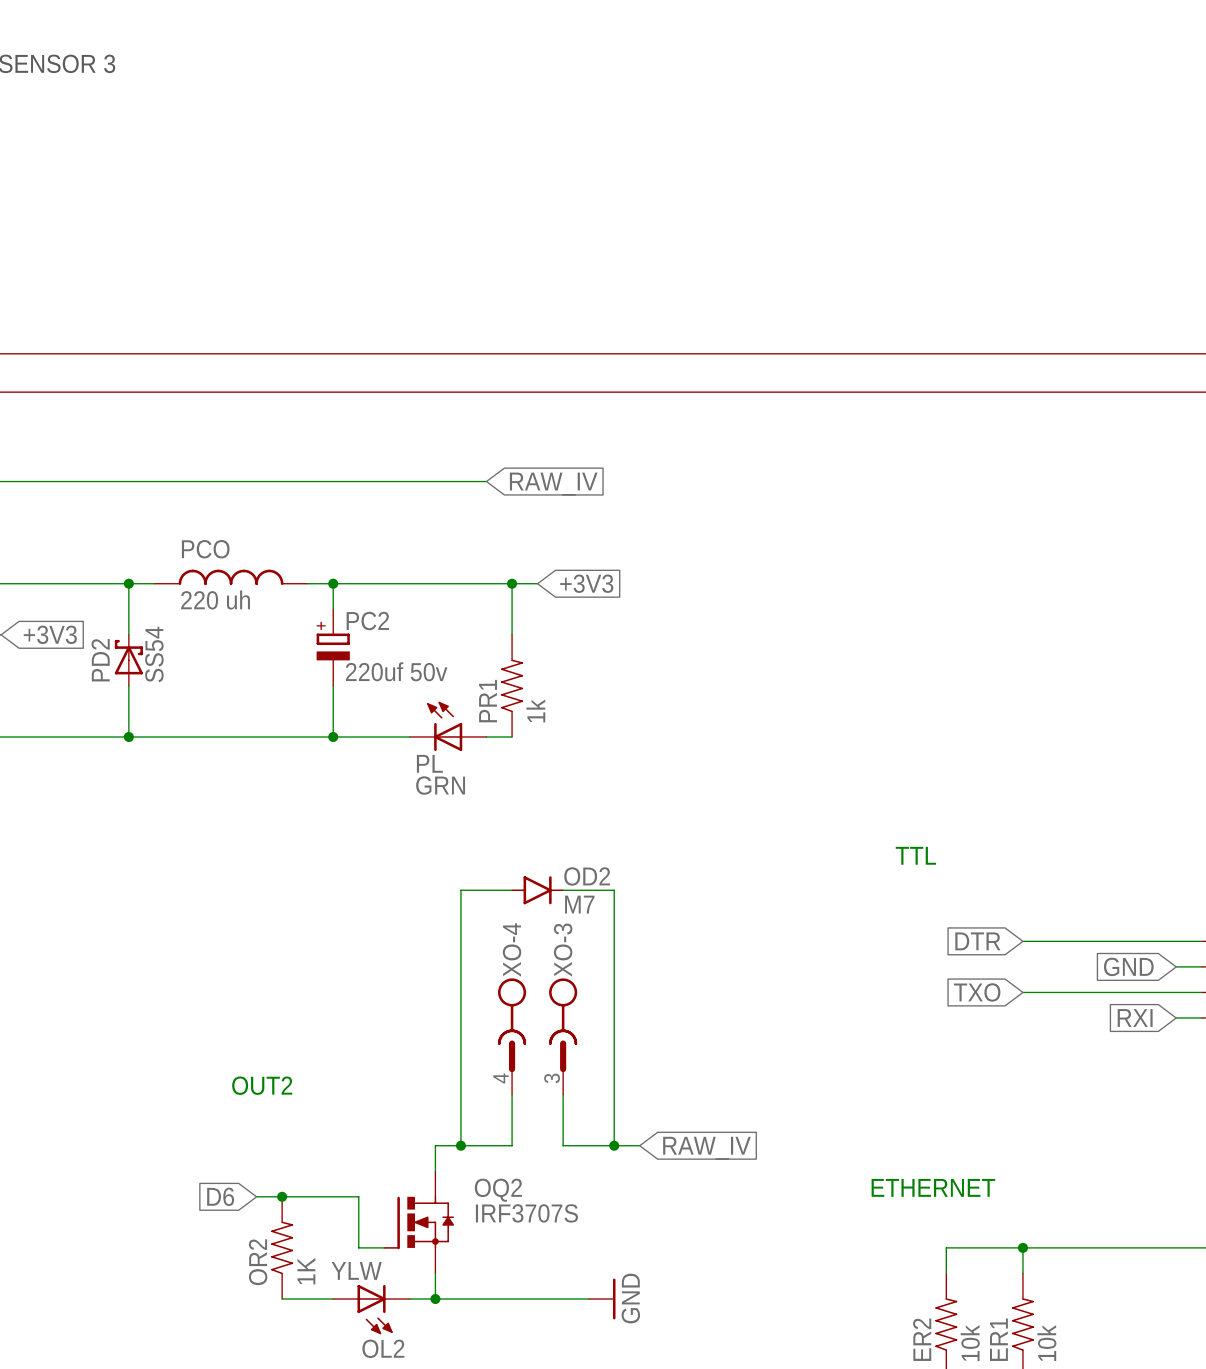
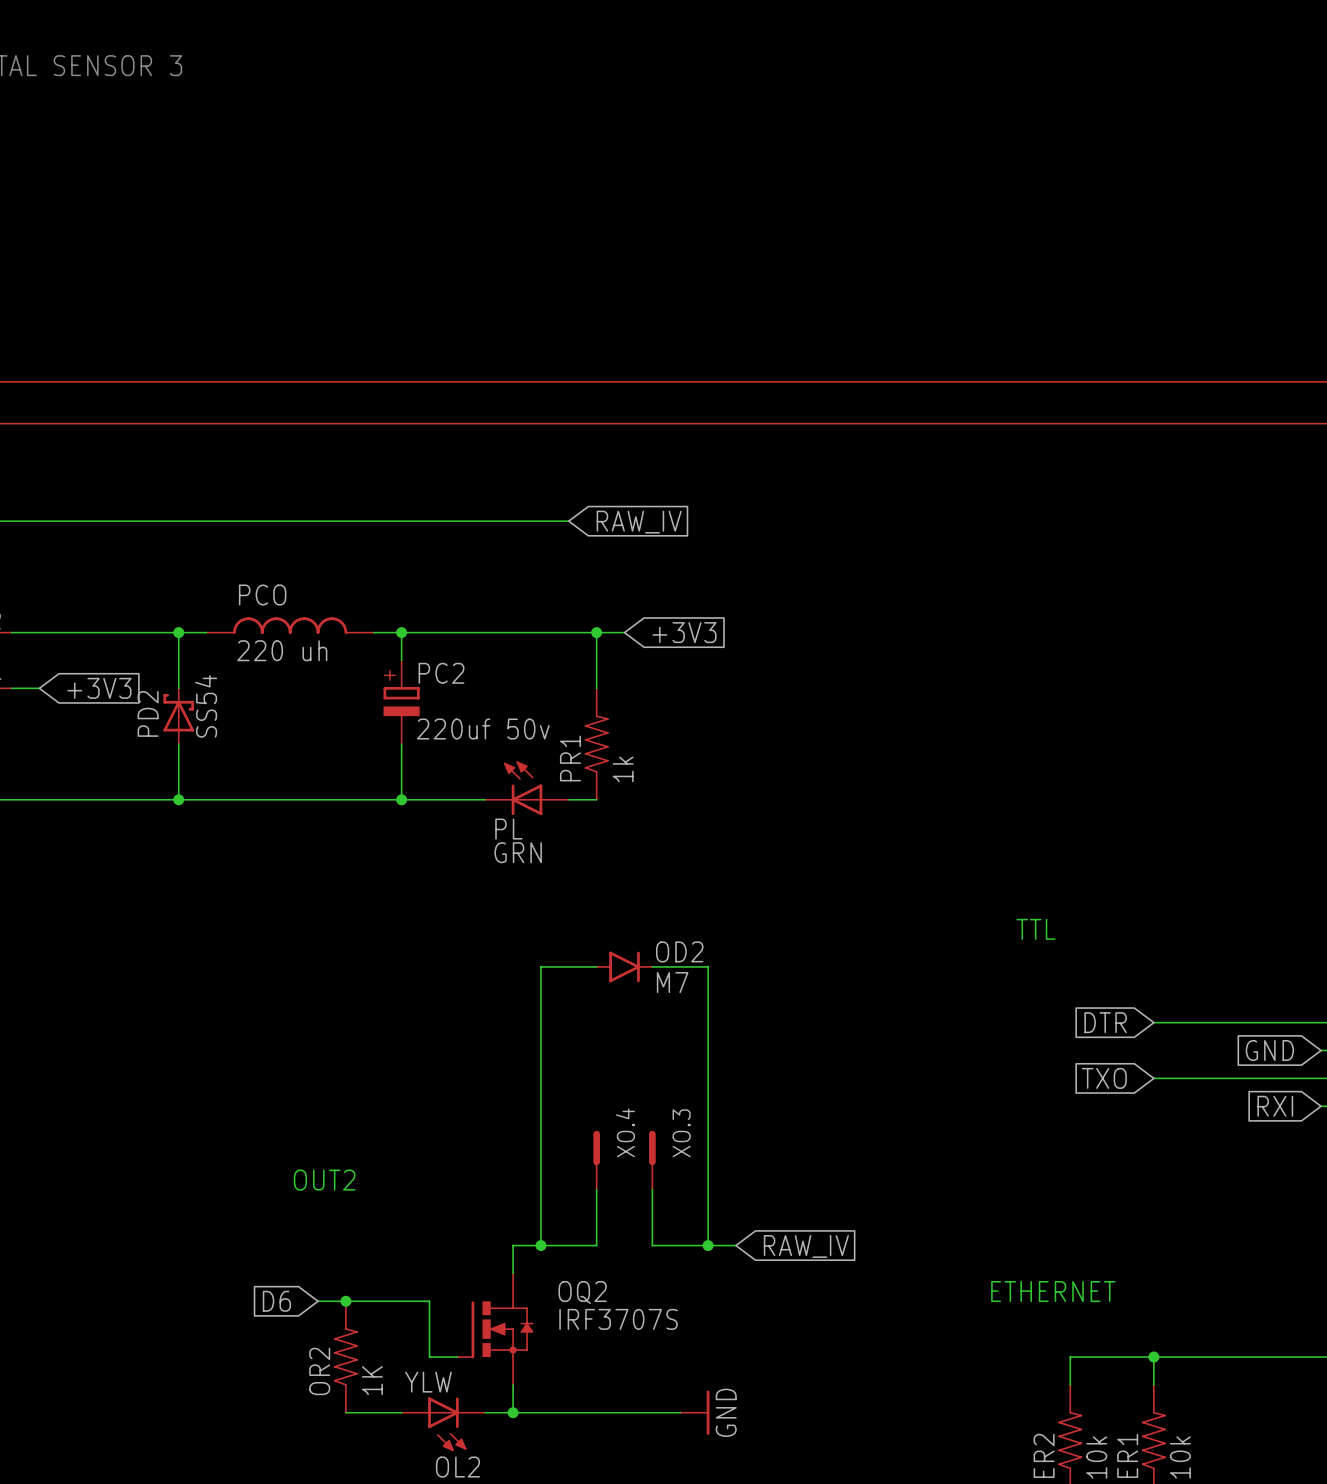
XO-4: (512, 1036) -> none
XO-3: (563, 1036) -> none
XO.4: none -> (596, 1160)
XO.3: none -> (652, 1160)

